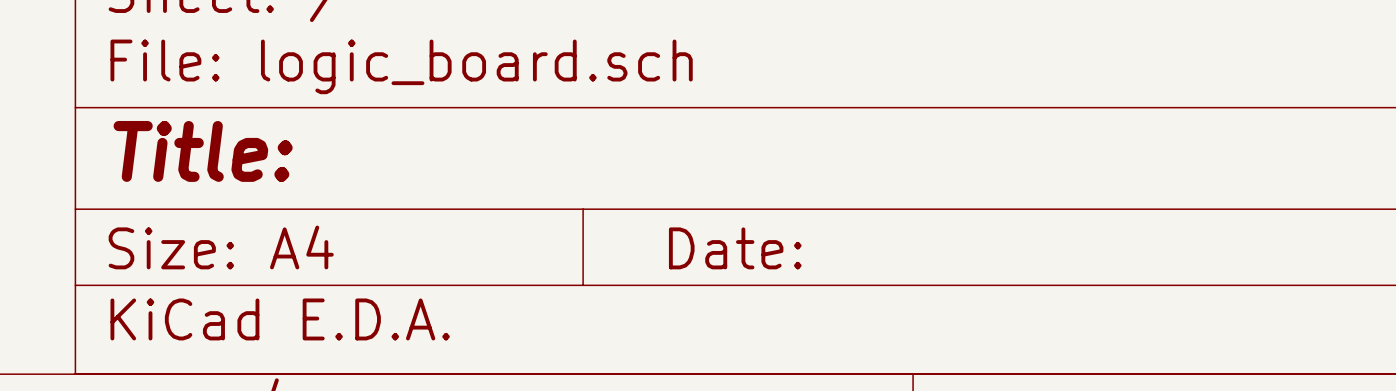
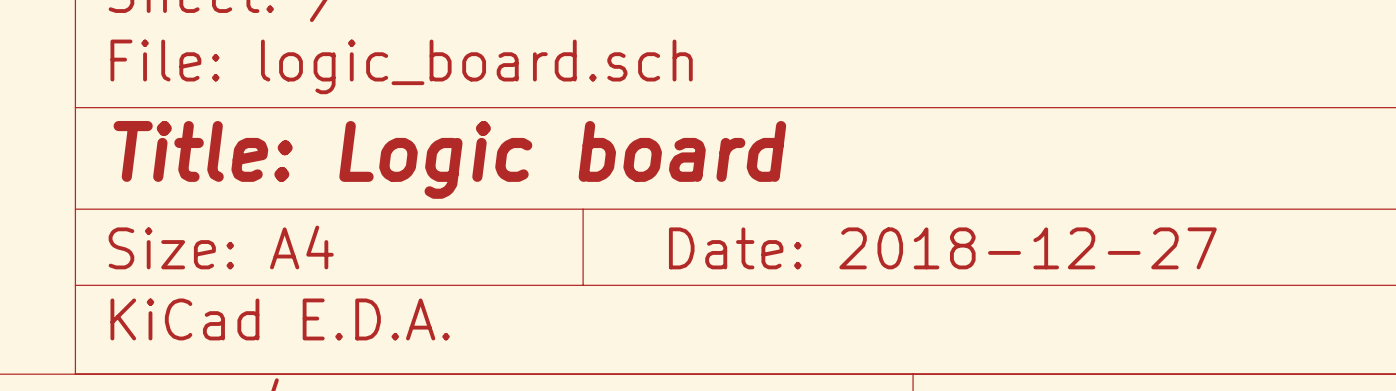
title block: Title: (203, 151) -> Title: Logic board (449, 159)
title block: Date: (735, 248) -> Date: 2018-12-27 (942, 248)

